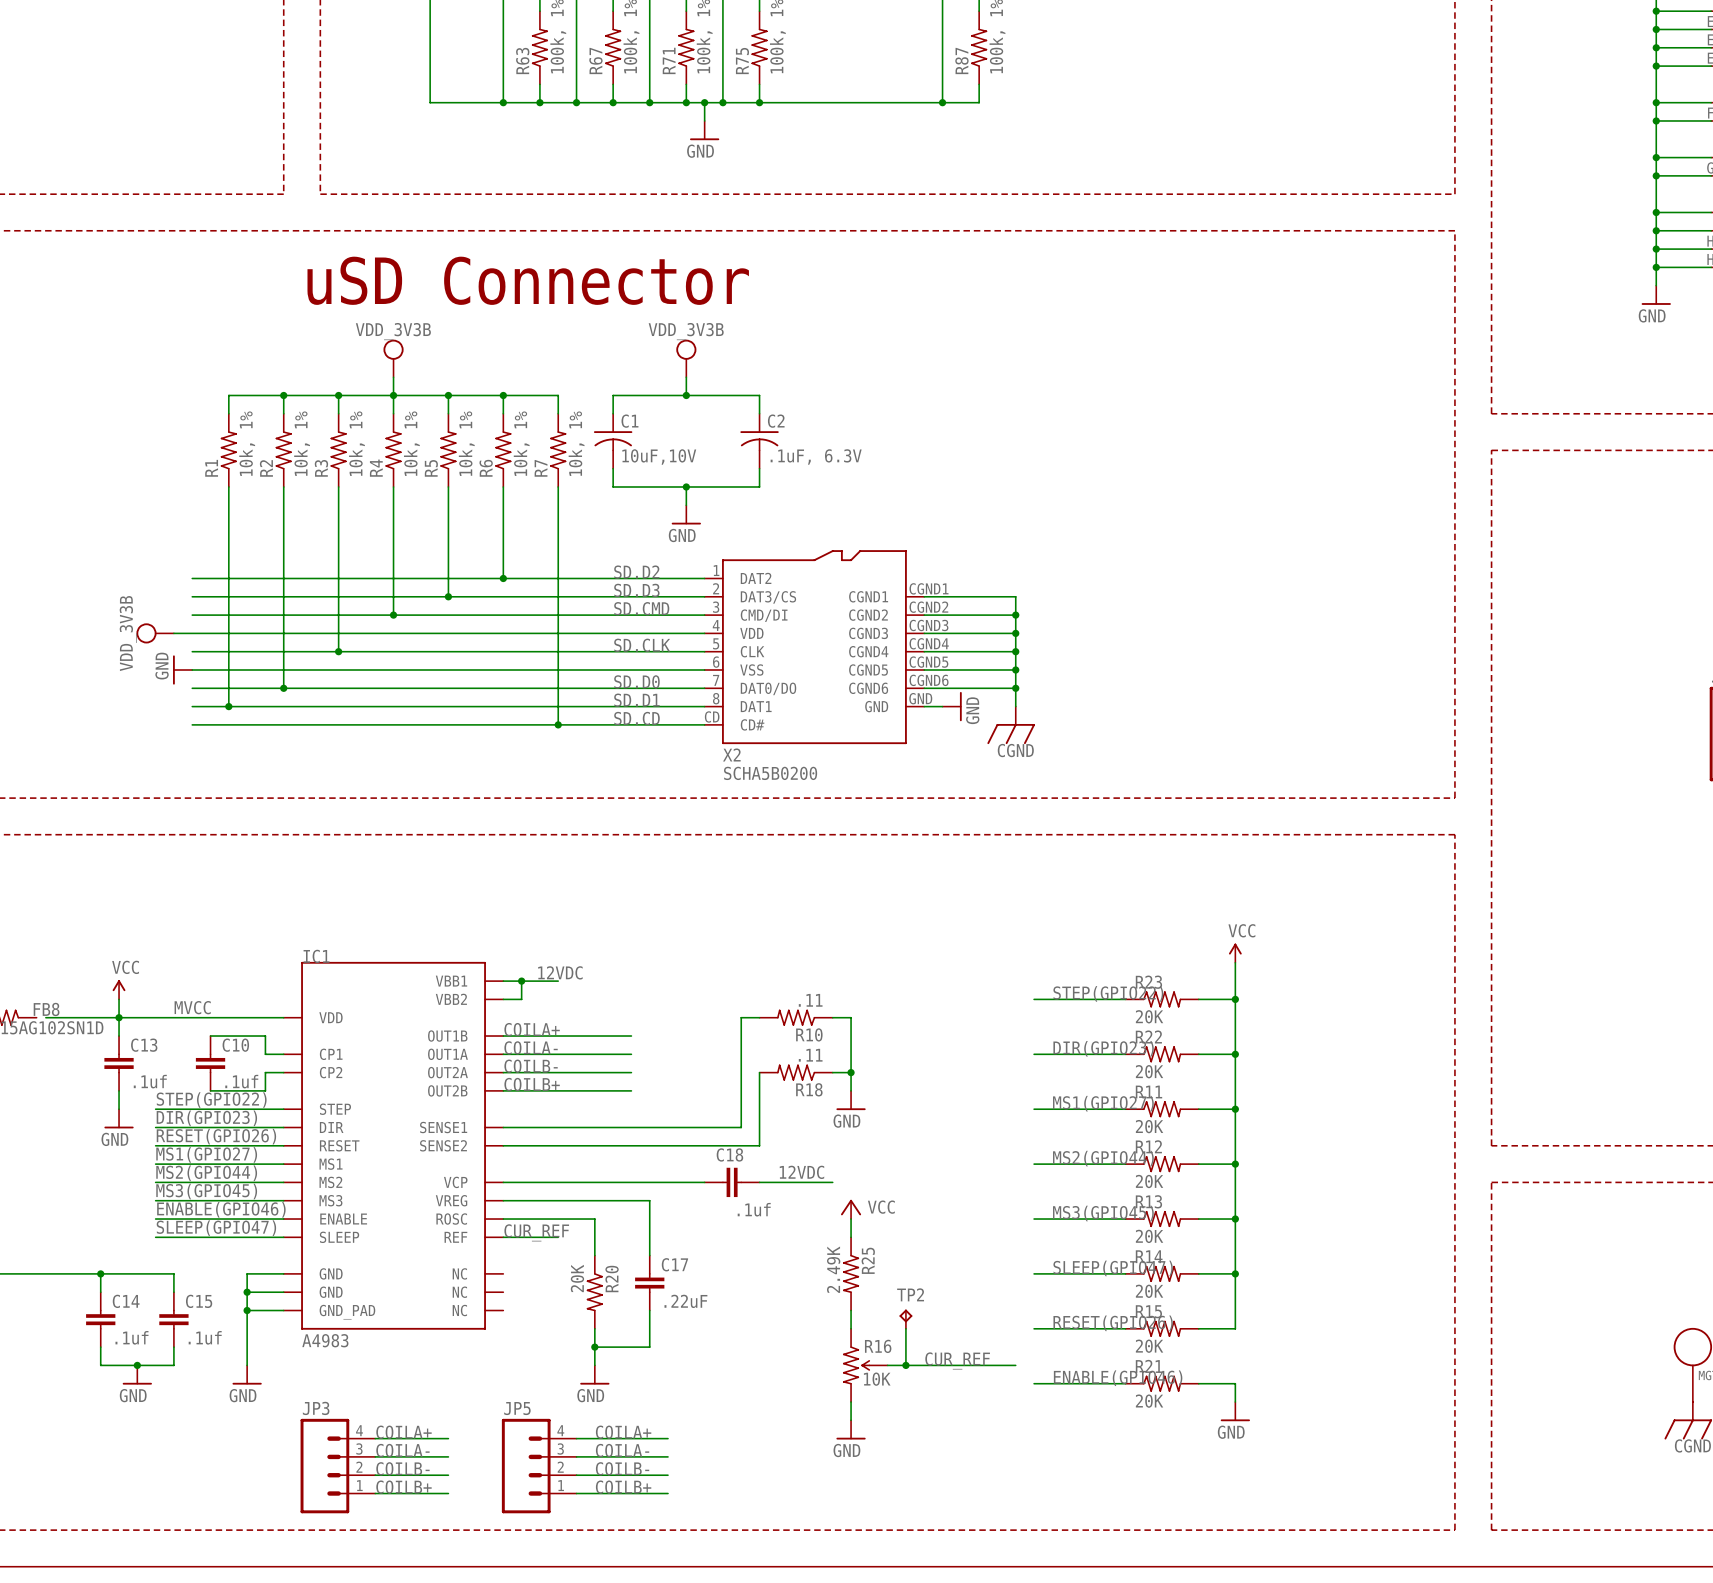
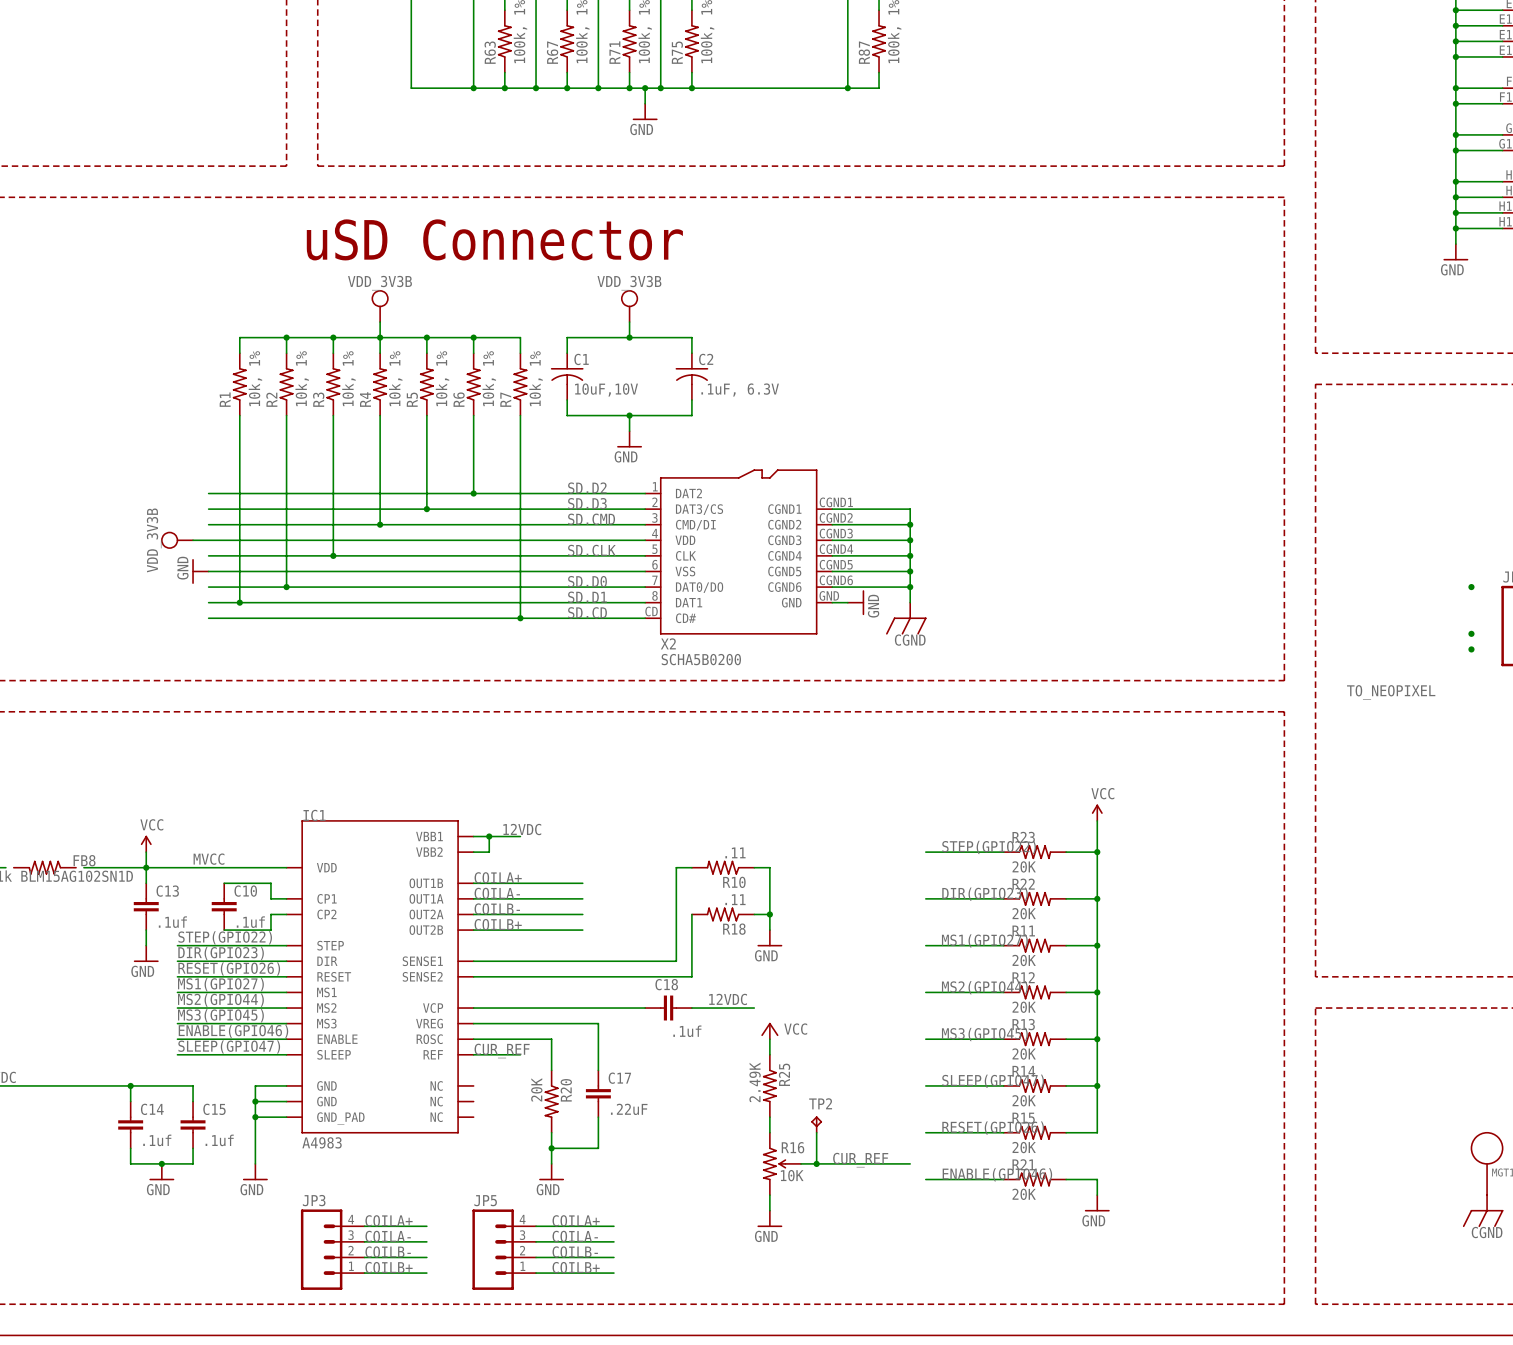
junction: none -> (1471, 587)
junction: none -> (1471, 633)
junction: none -> (1471, 649)
label: none -> TO_NEOPIXEL (1391, 692)

